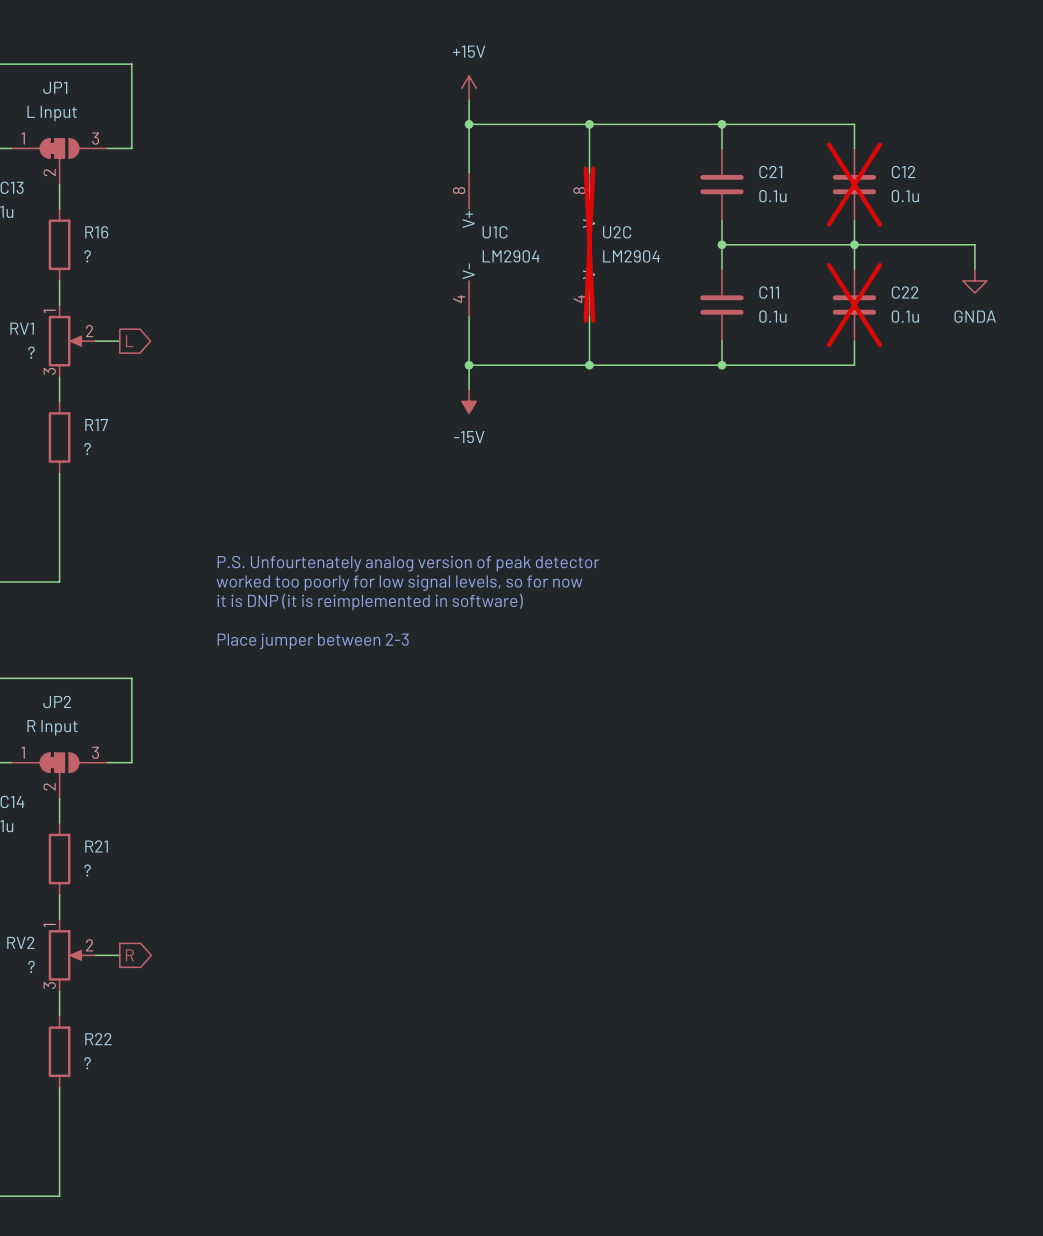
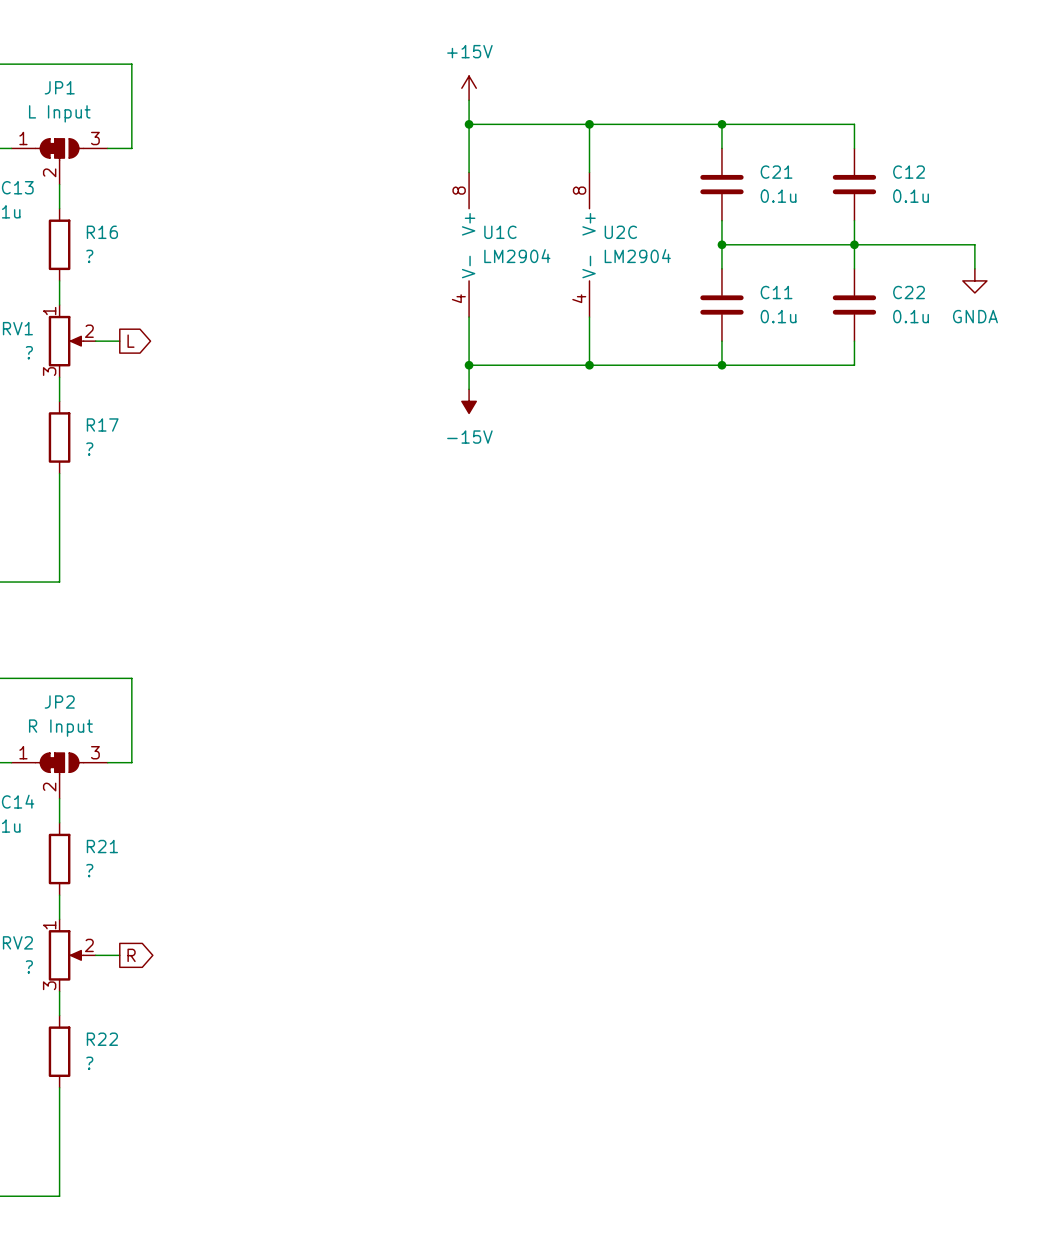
C12 do-not-place cross: (854, 184) -> none
U2C do-not-place cross: (589, 244) -> none
C22 do-not-place cross: (854, 305) -> none
text: P.S. Unfourtenately analog version of peak detector (408, 563) -> none
text: worked too poorly for low signal levels, so for now (399, 583) -> none
text: it is DNP (it is reimplemented in software) (370, 602) -> none
text: Place jumper between 2-3 (313, 641) -> none

